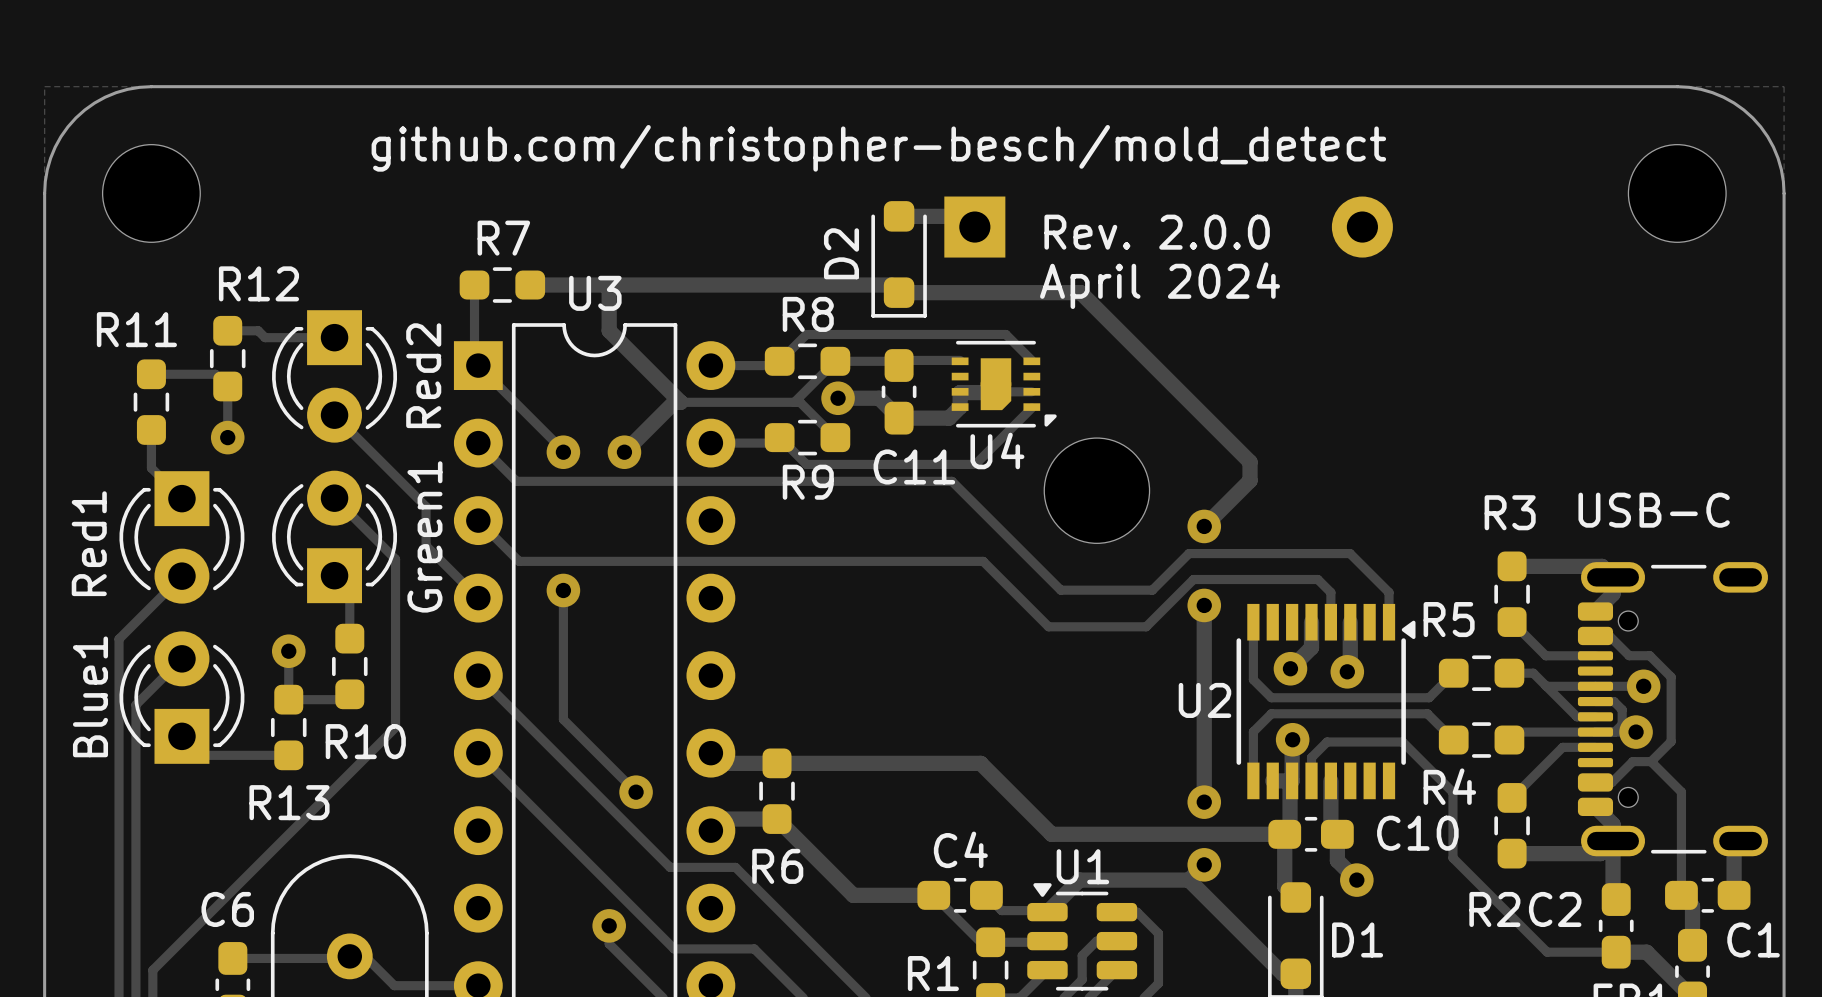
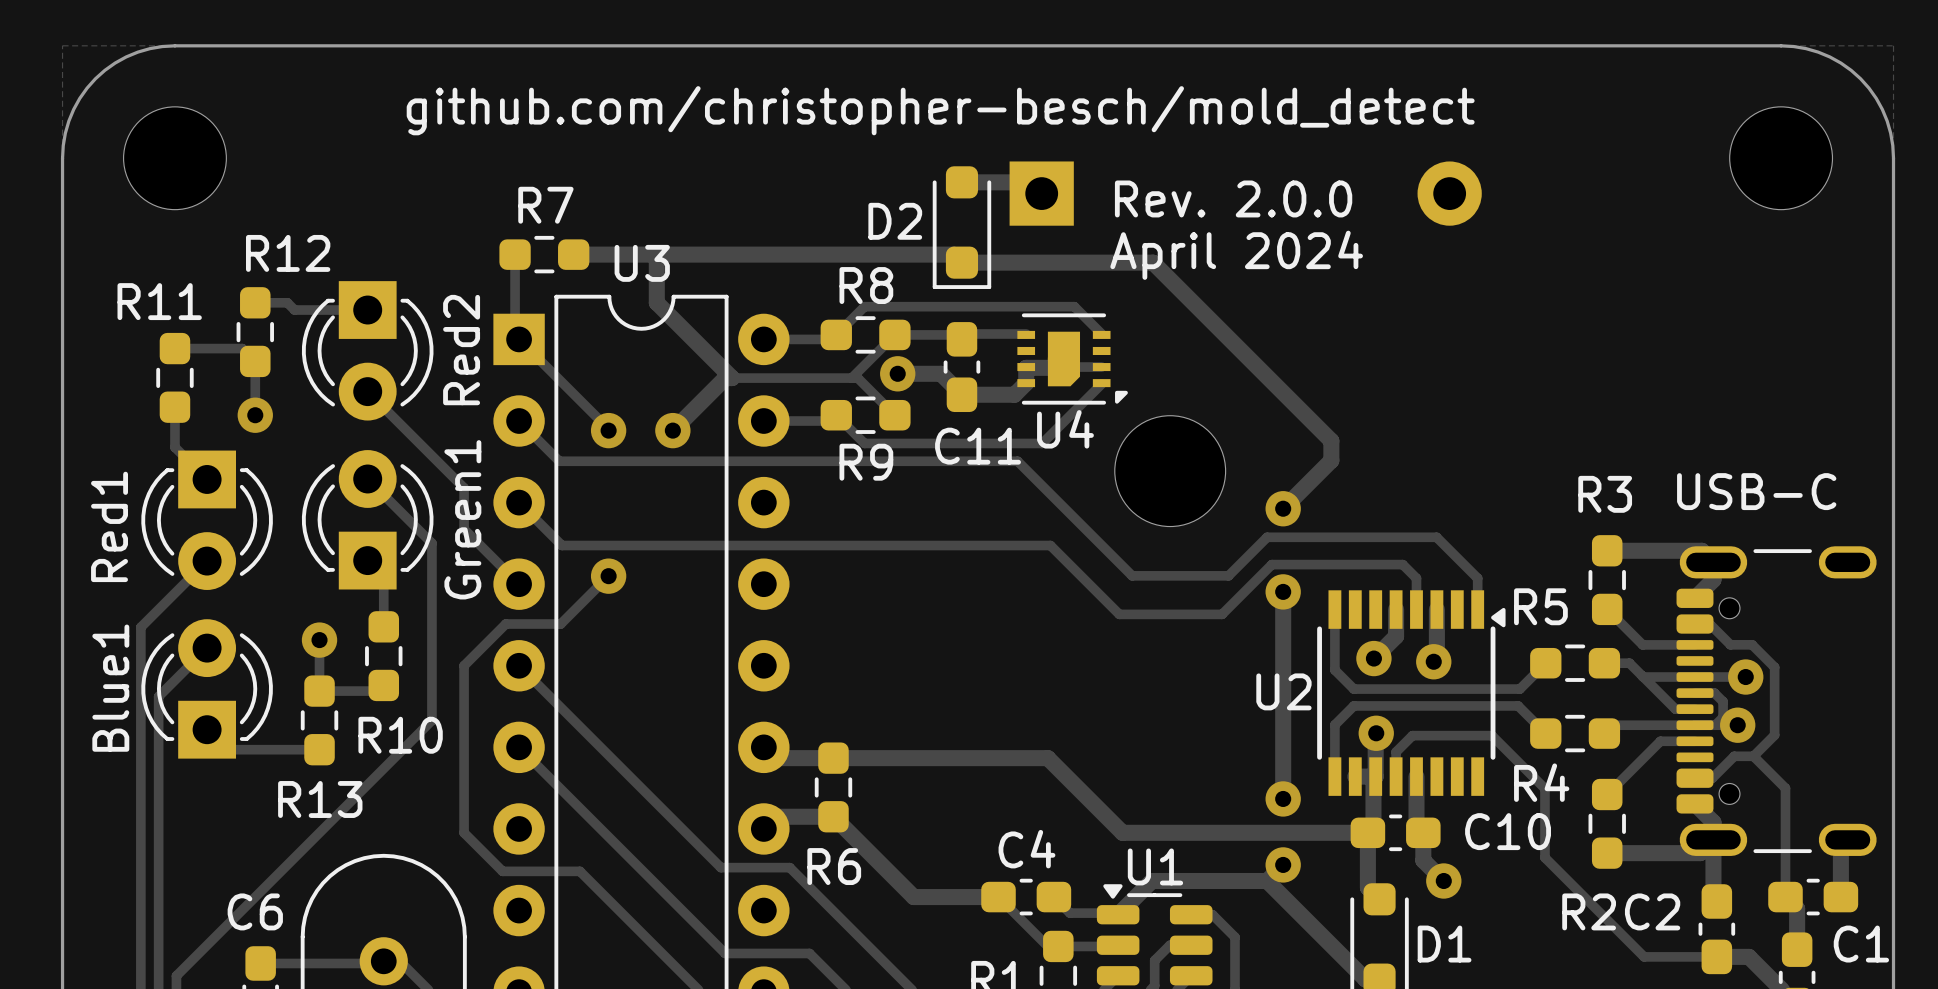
D2 name rotation: 0° (841, 253) -> 90° clockwise (895, 221)
track: (563, 590) (563, 719) (636, 792) -> (608, 576) (560, 624) (505, 624) (464, 665) (464, 832) (502, 871) (579, 871) (656, 948)
via: (636, 792) -> none
via: (609, 925) -> none

